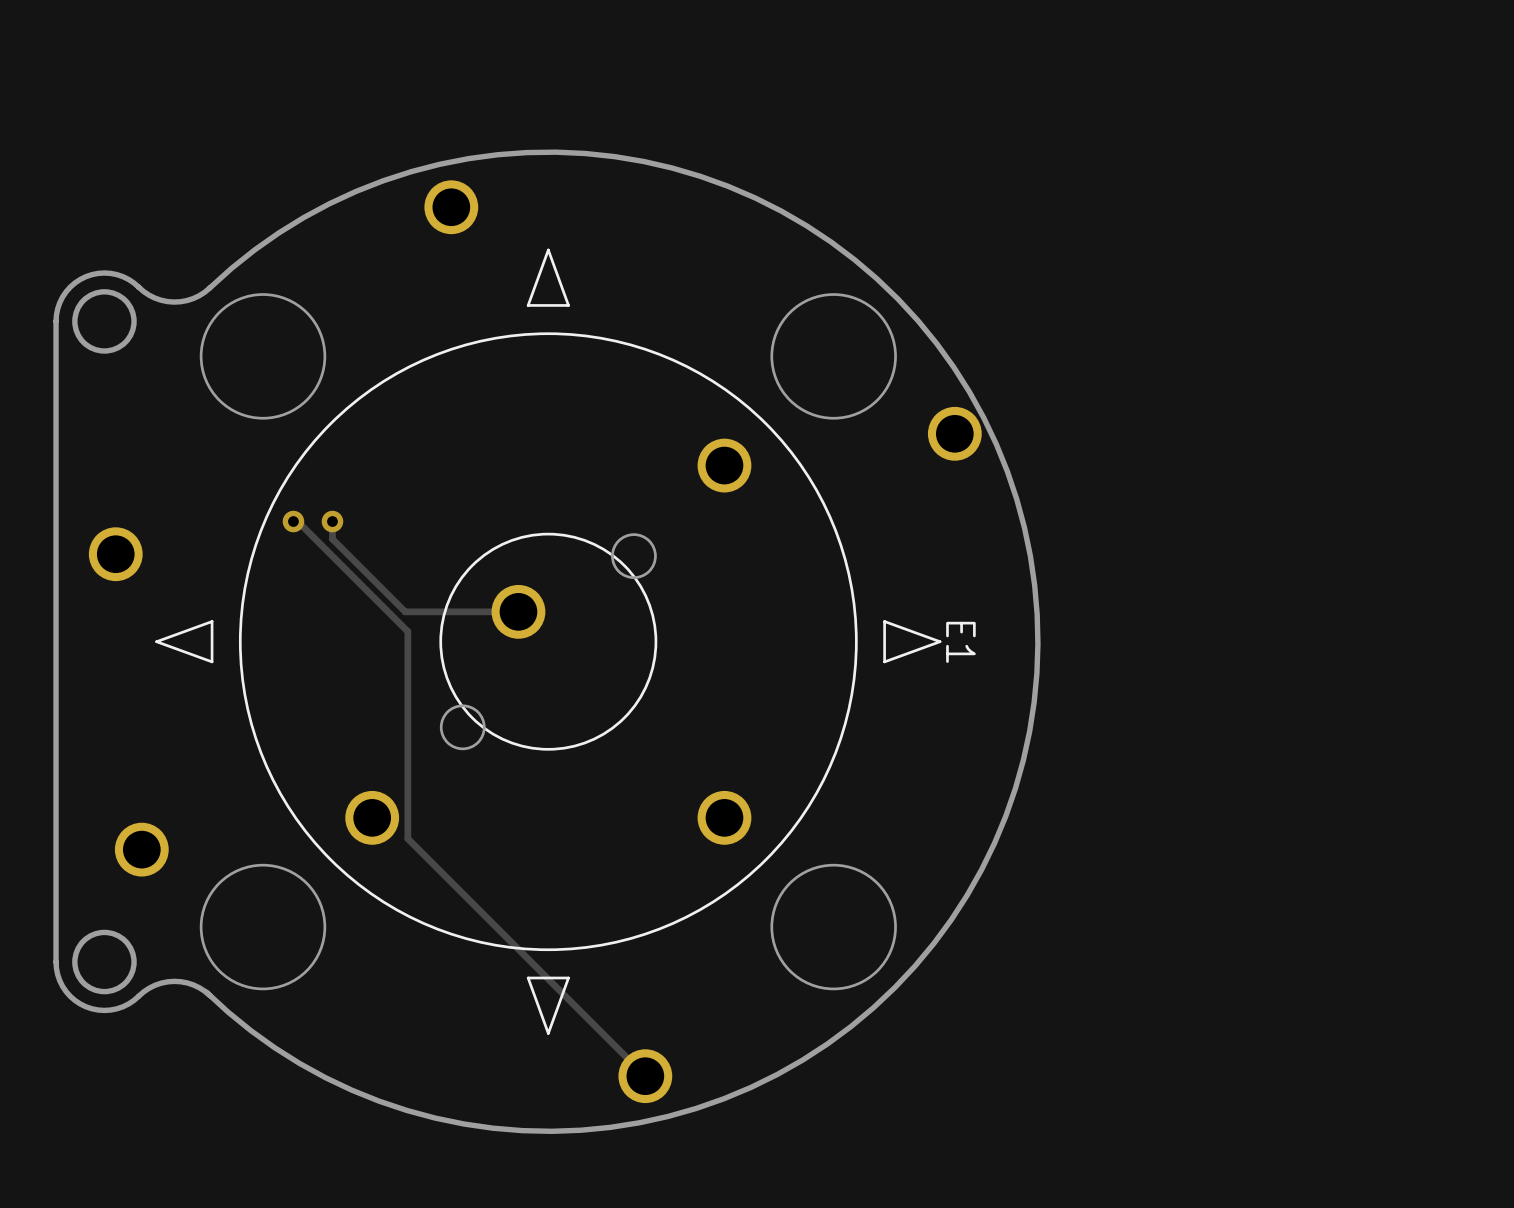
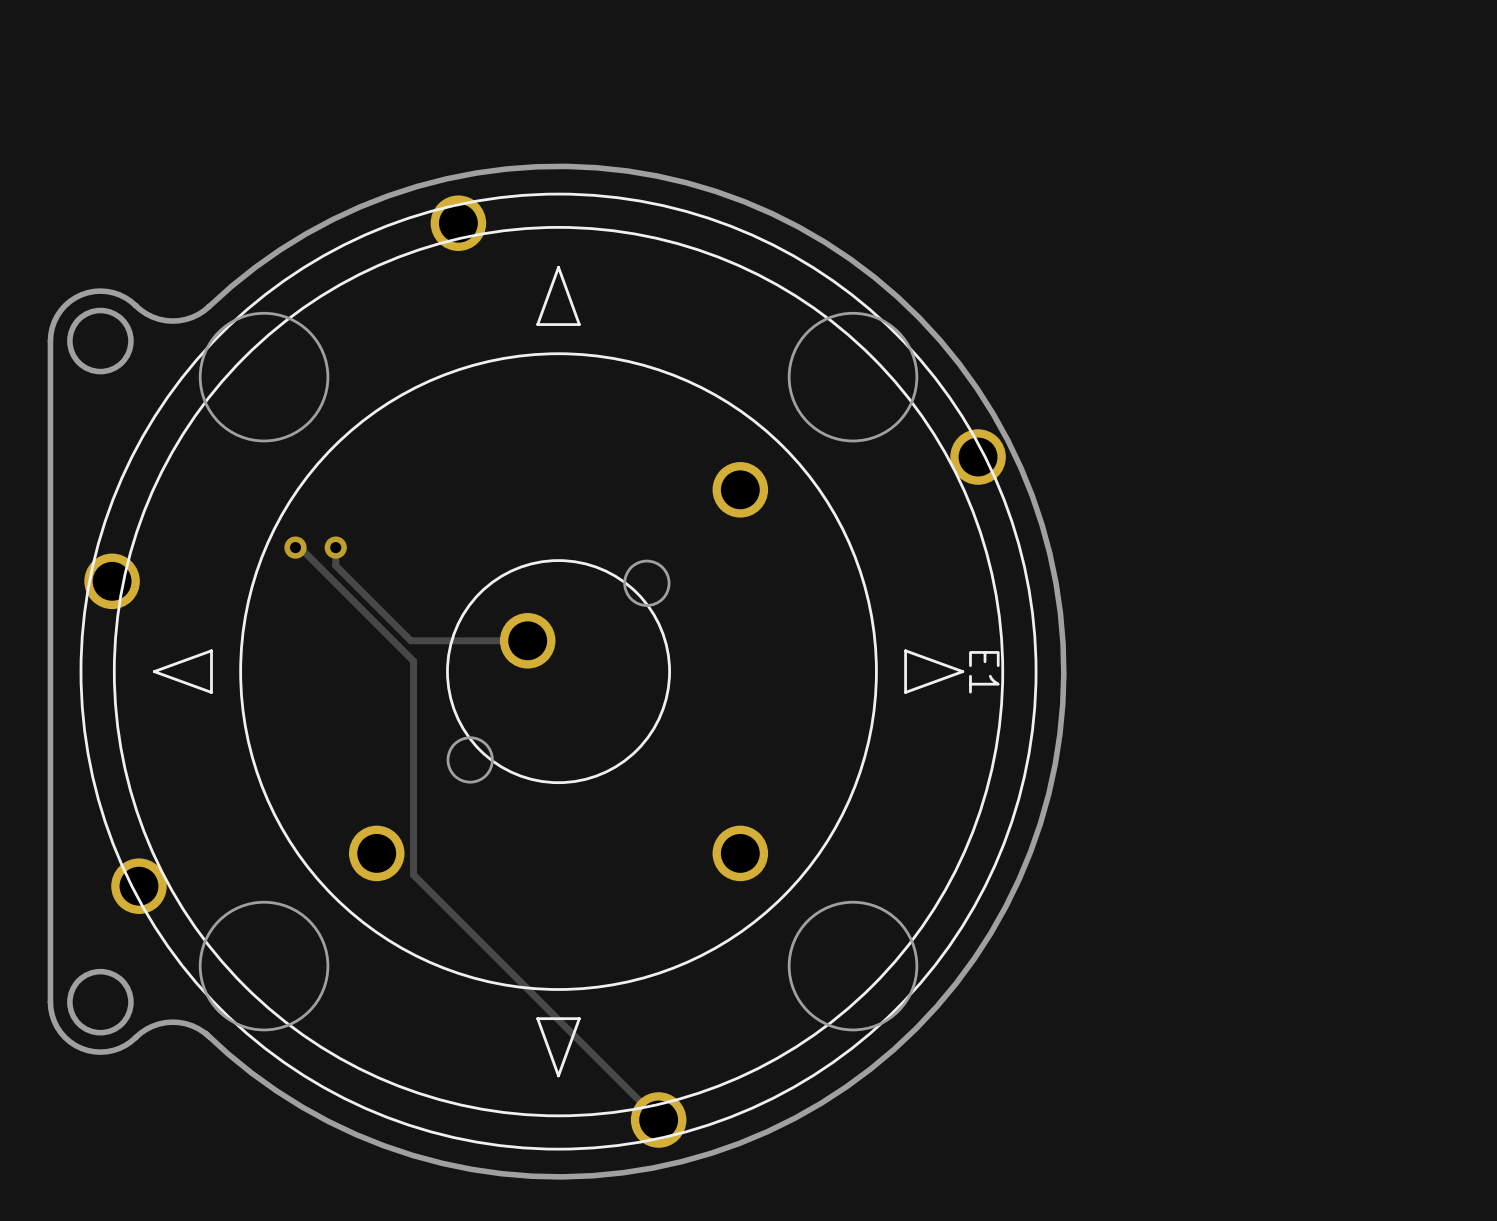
E1 footprint: [88, 180, 982, 1104] -> [79, 192, 1038, 1151]

